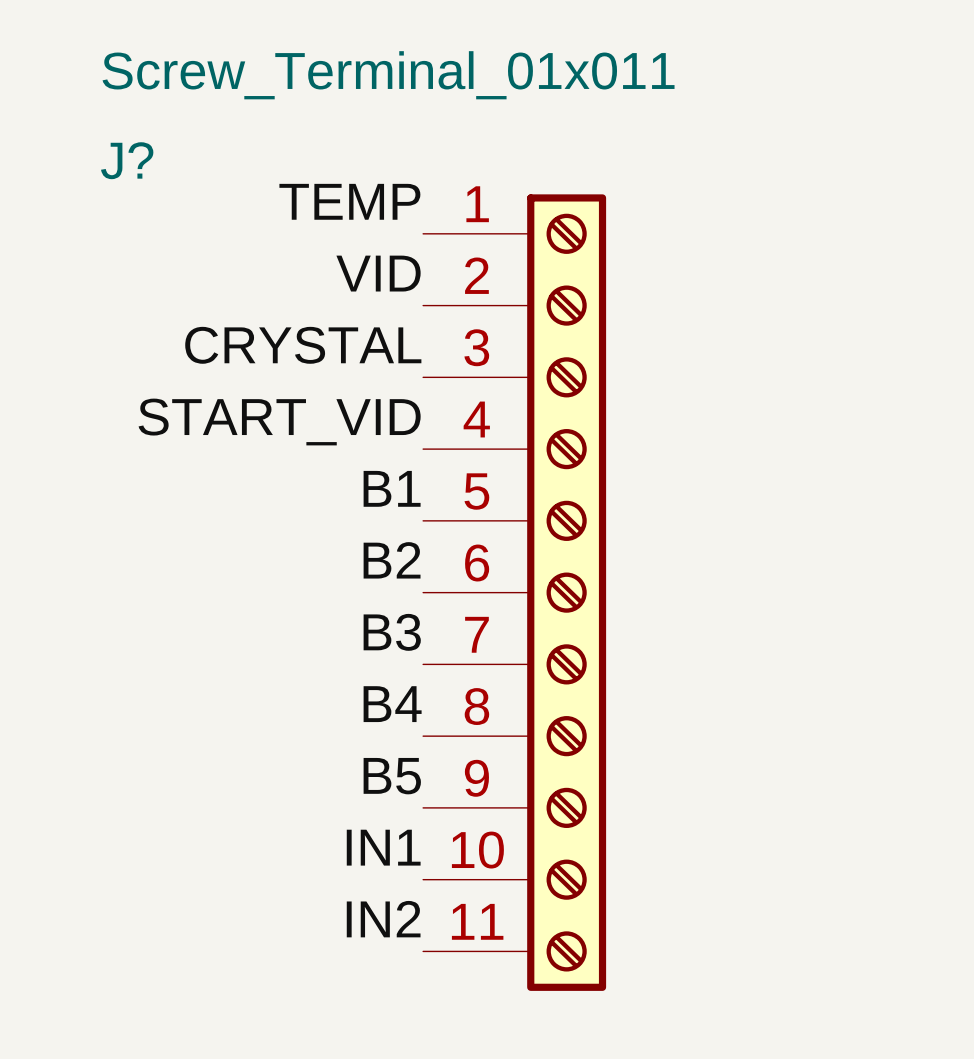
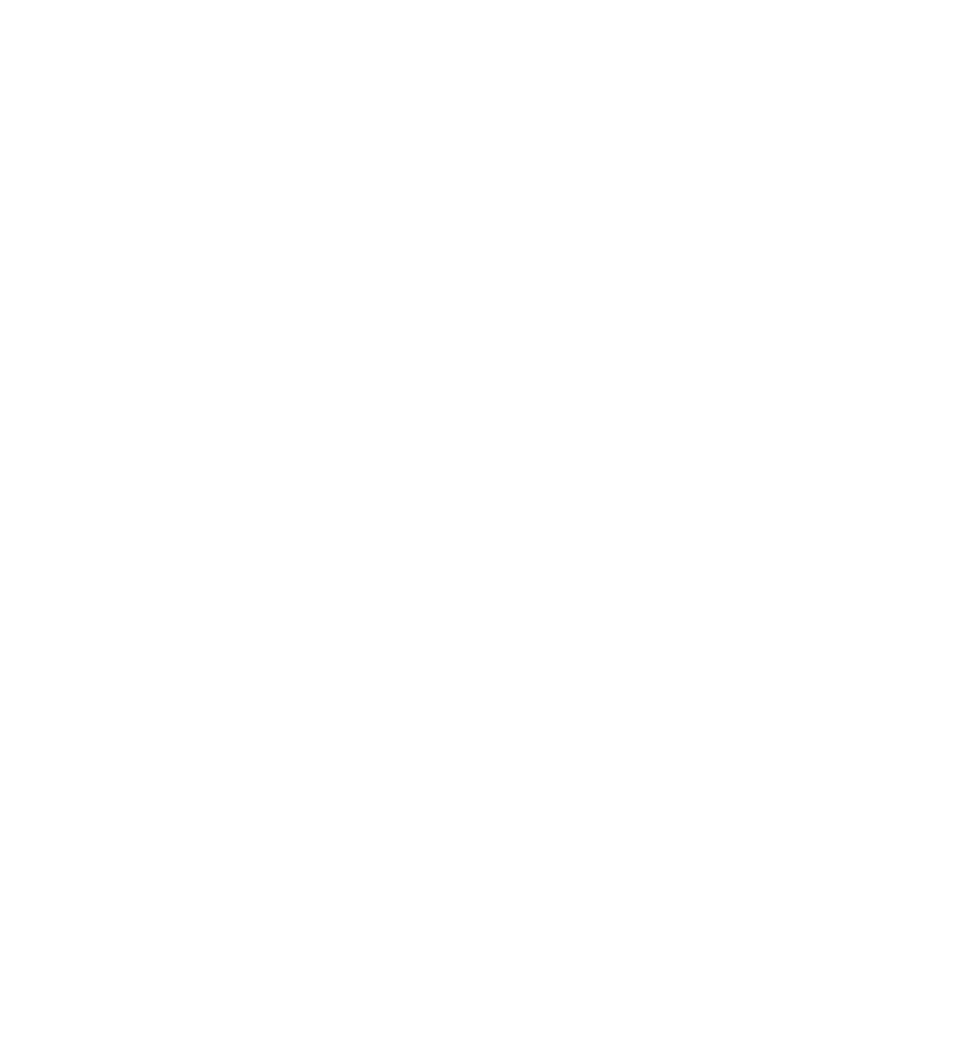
label: TEMP (349, 201) -> none
label: VID (378, 273) -> none
label: CRYSTAL (303, 345) -> none
label: START_VID (279, 422) -> none
label: B1 (392, 488) -> none
label: B2 (392, 560) -> none
J?: Screw_Terminal_01x011 (514, 592) -> none
label: B3 (392, 632) -> none
label: B4 (392, 704) -> none
label: B5 (392, 776) -> none
label: IN1 (383, 847) -> none
label: IN2 (383, 919) -> none

